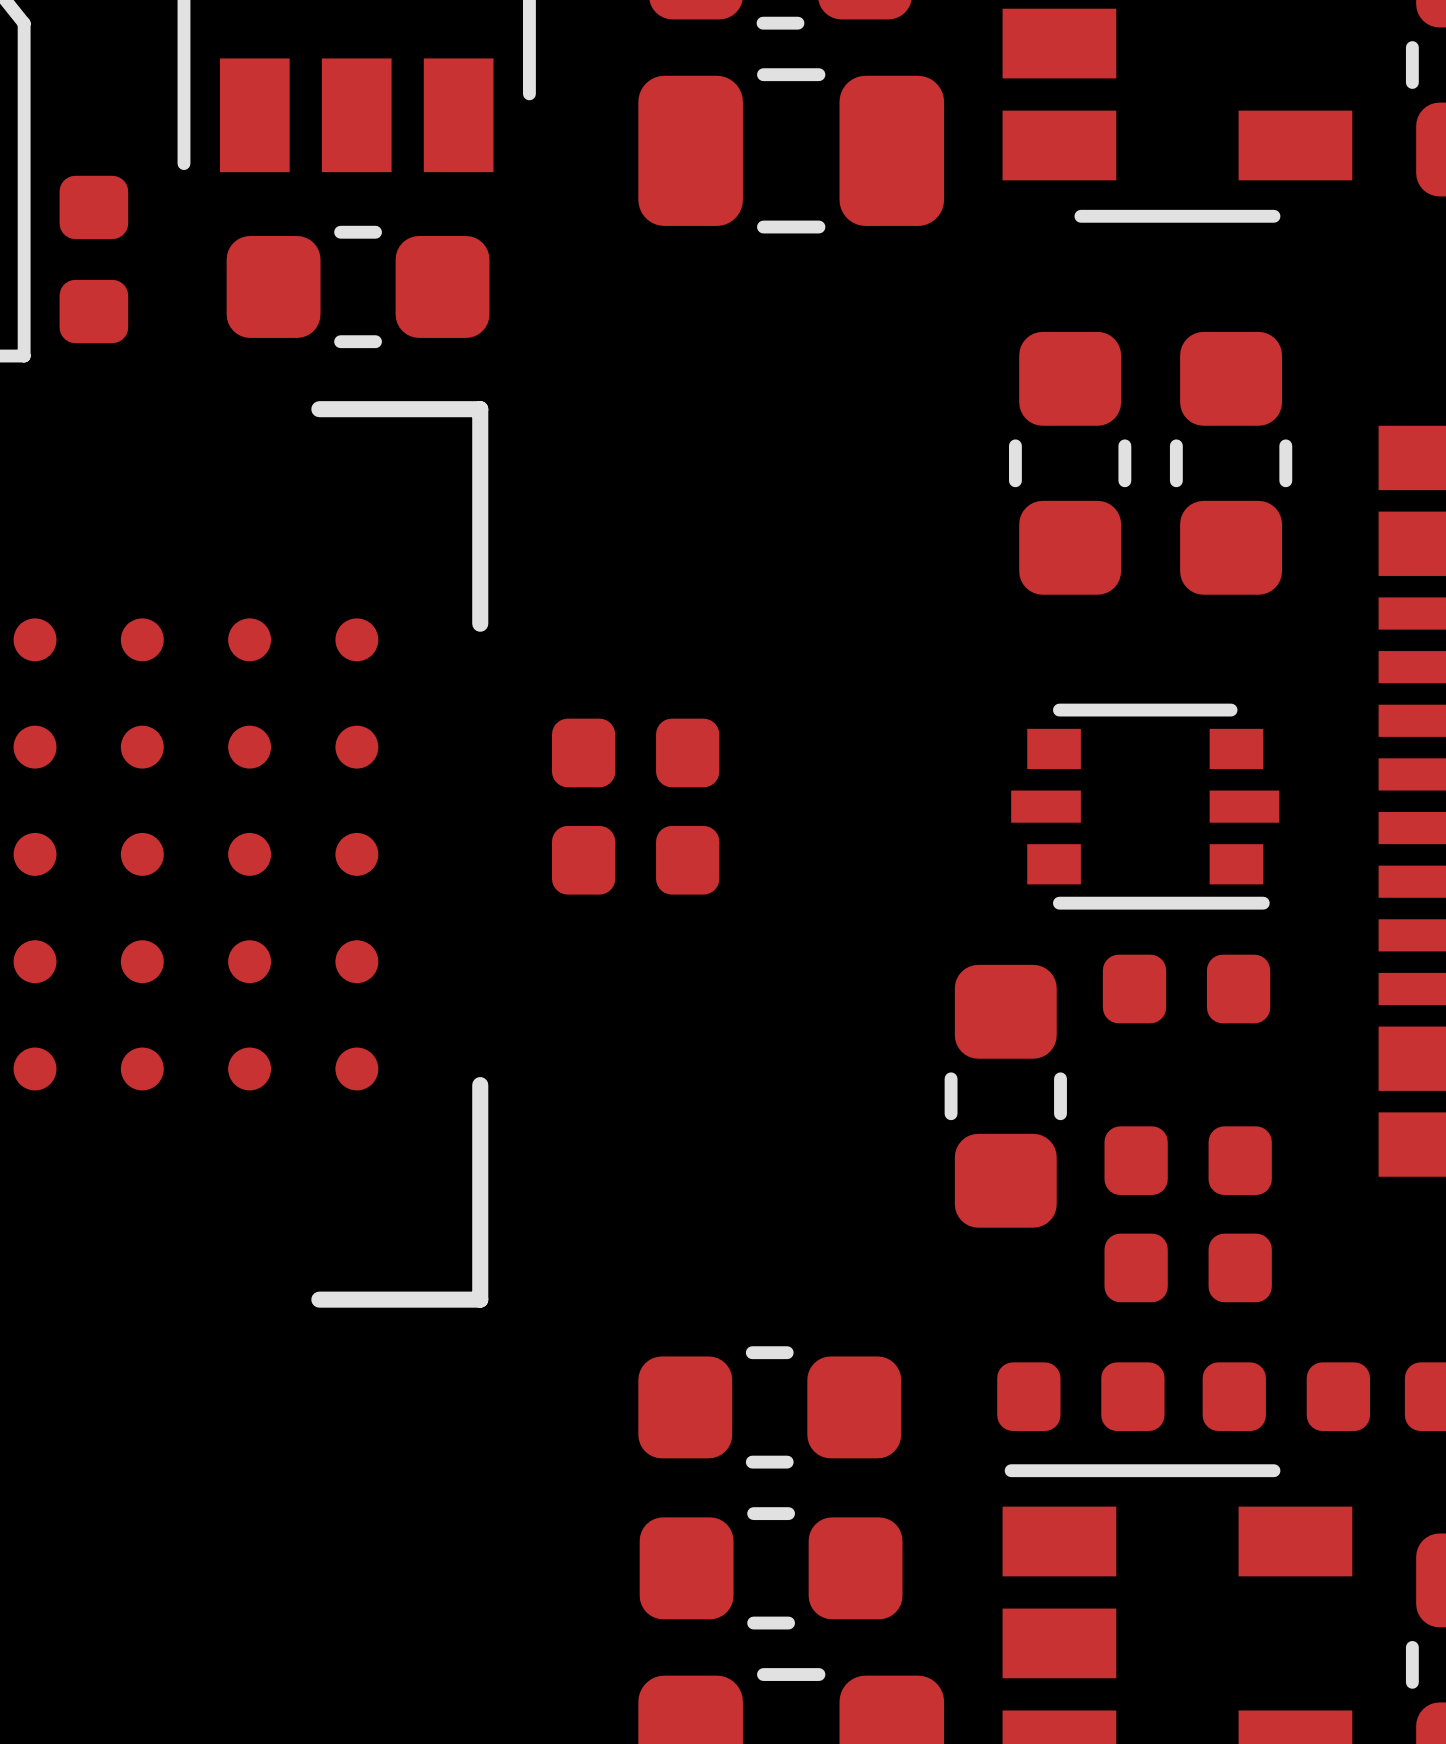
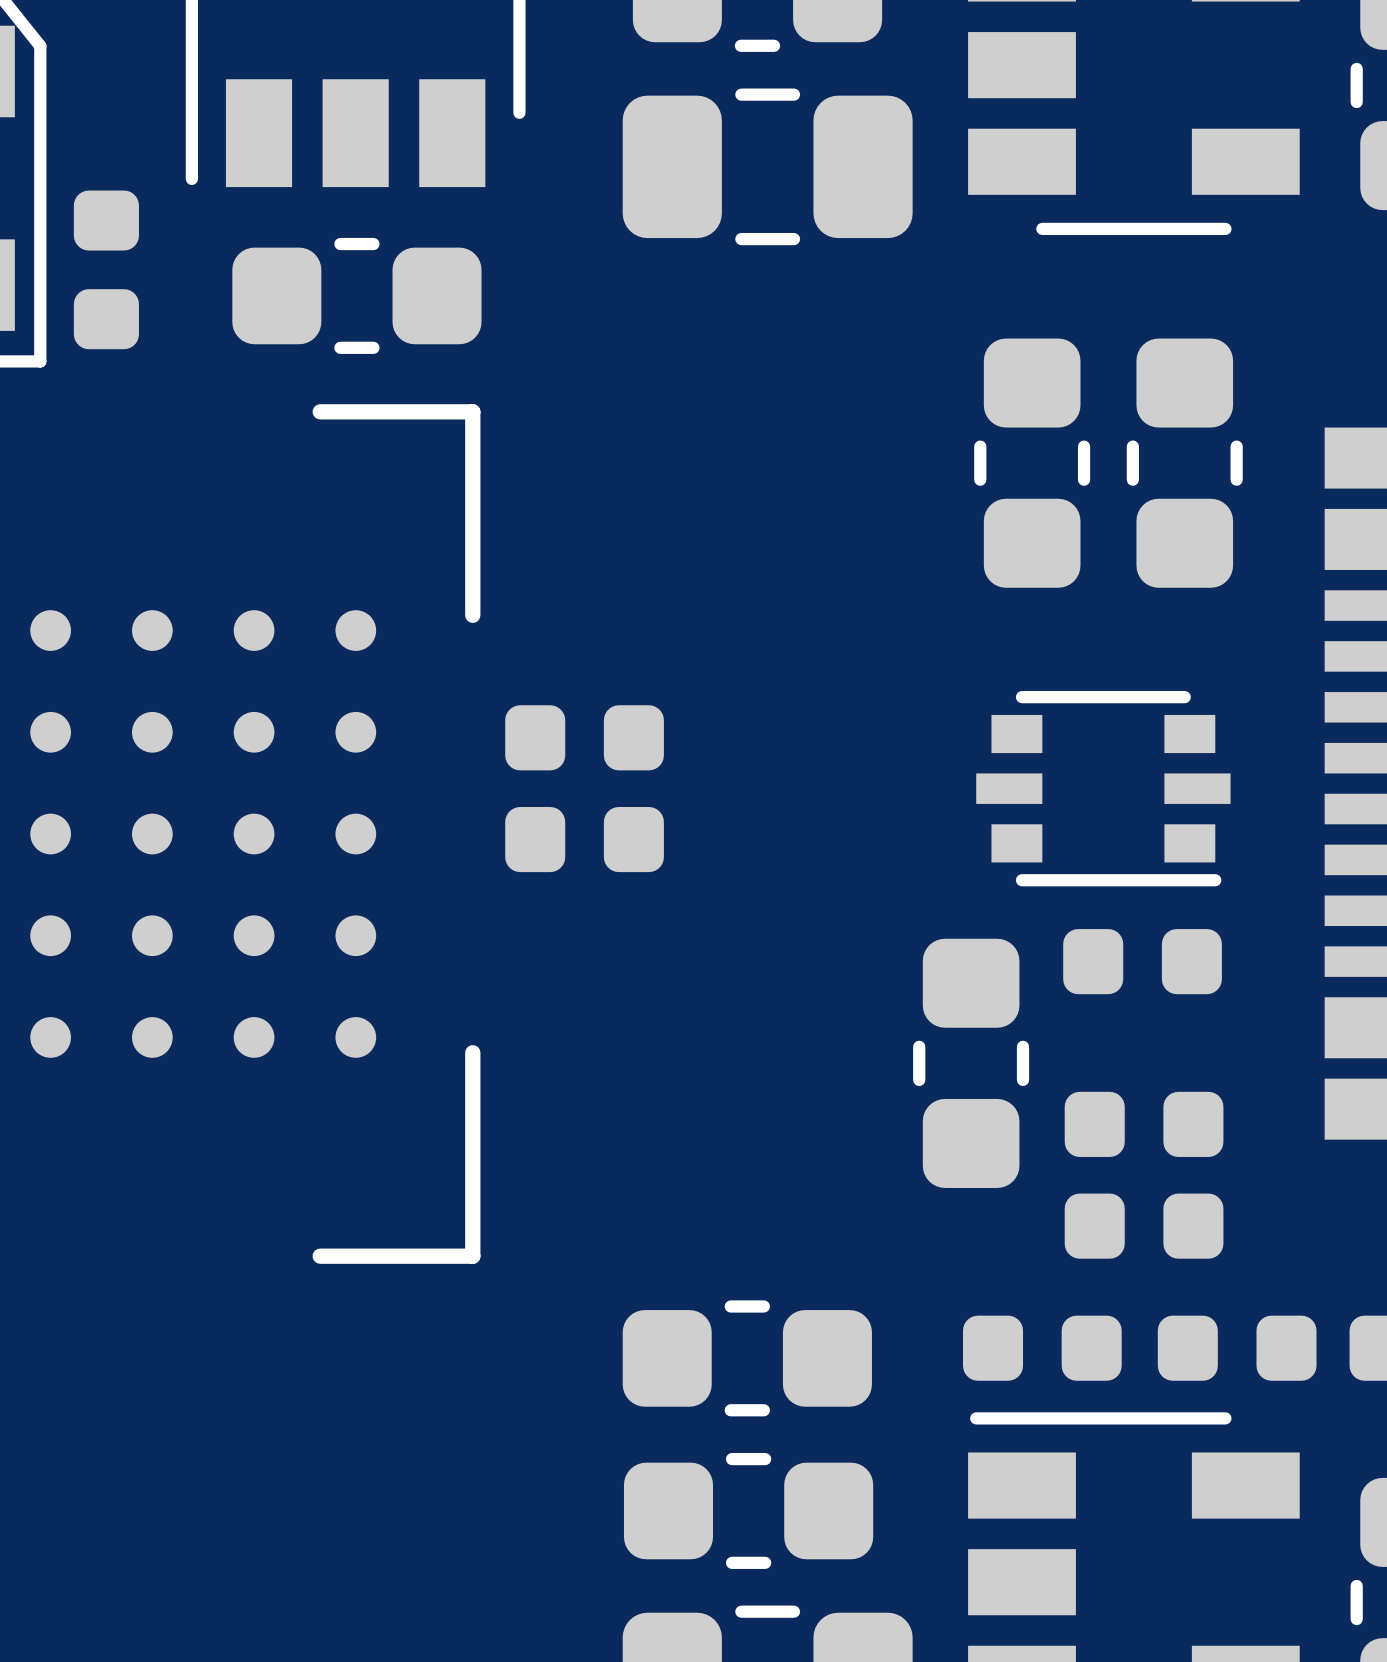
part position: (635, 752) -> (584, 737)
part position: (635, 860) -> (584, 839)

